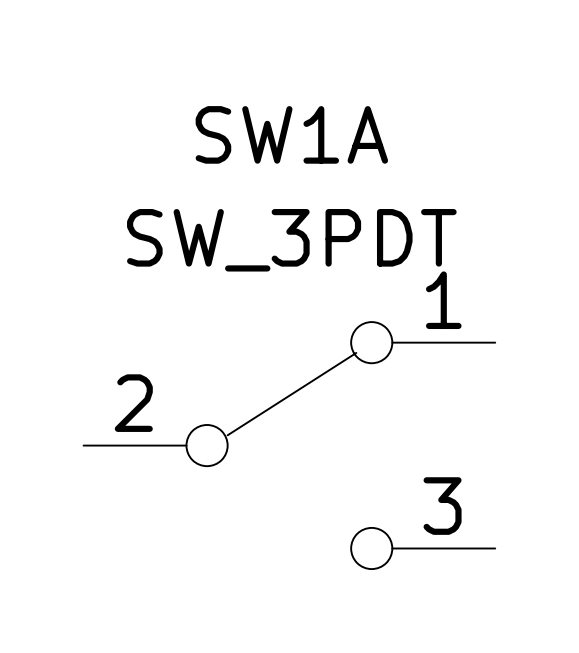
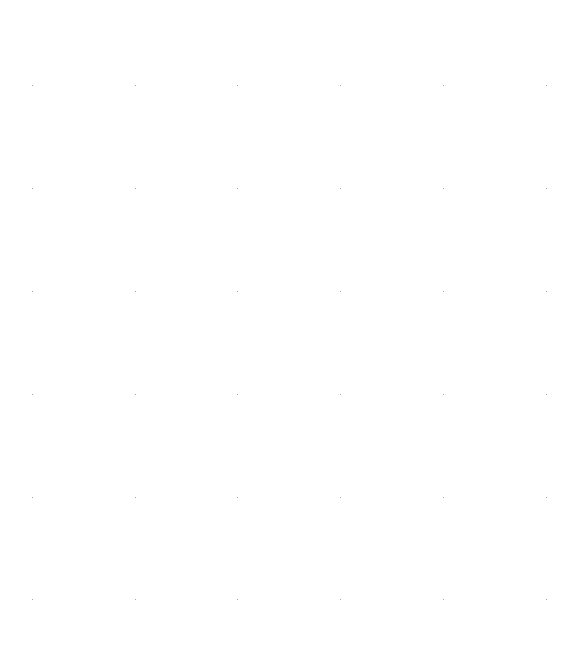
SW1A: SW_3PDT (289, 445) -> none

